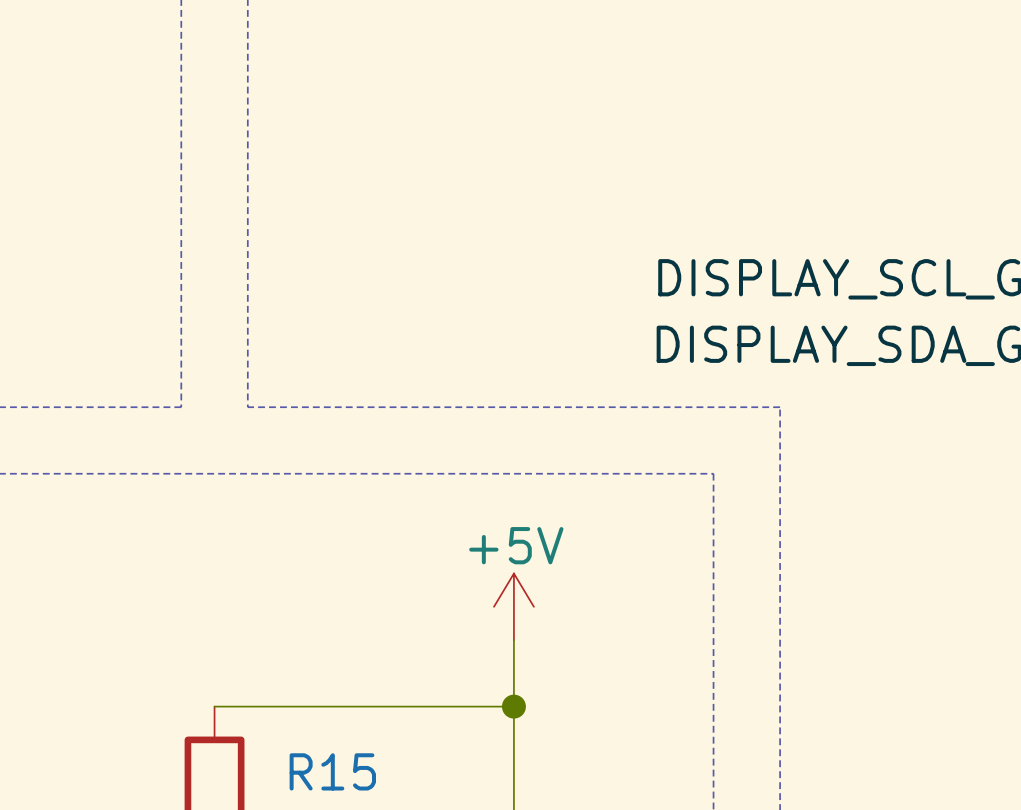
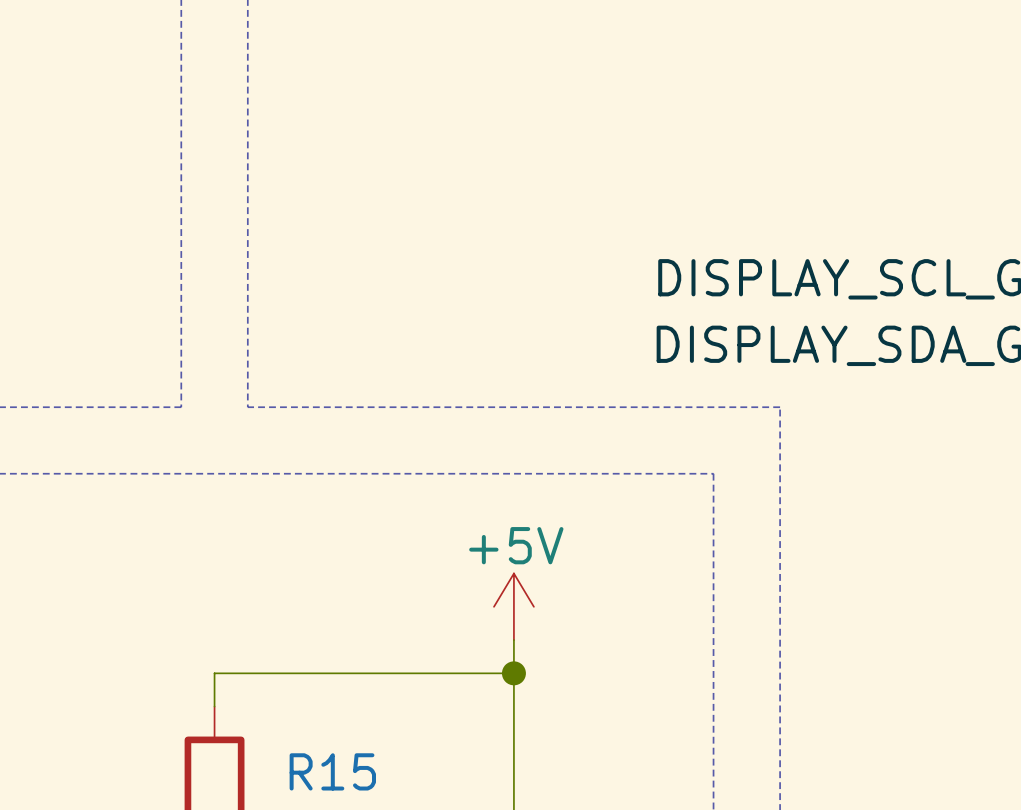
wire: (214, 706) (513, 706) -> (214, 706) (214, 673) (513, 673)
junction position: (513, 706) -> (513, 673)

